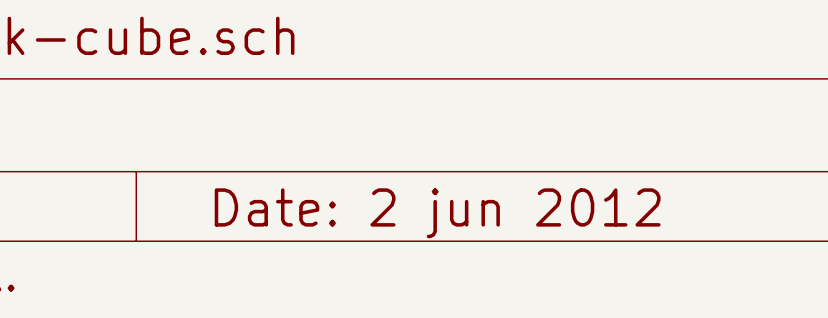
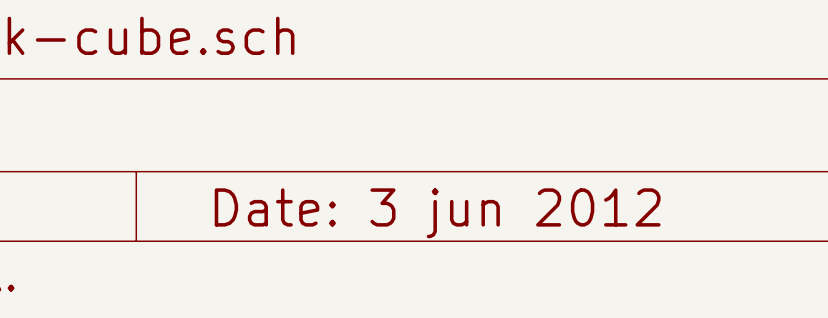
title block: Date: 2 jun 2012 (437, 213) -> Date: 3 jun 2012 (437, 213)

